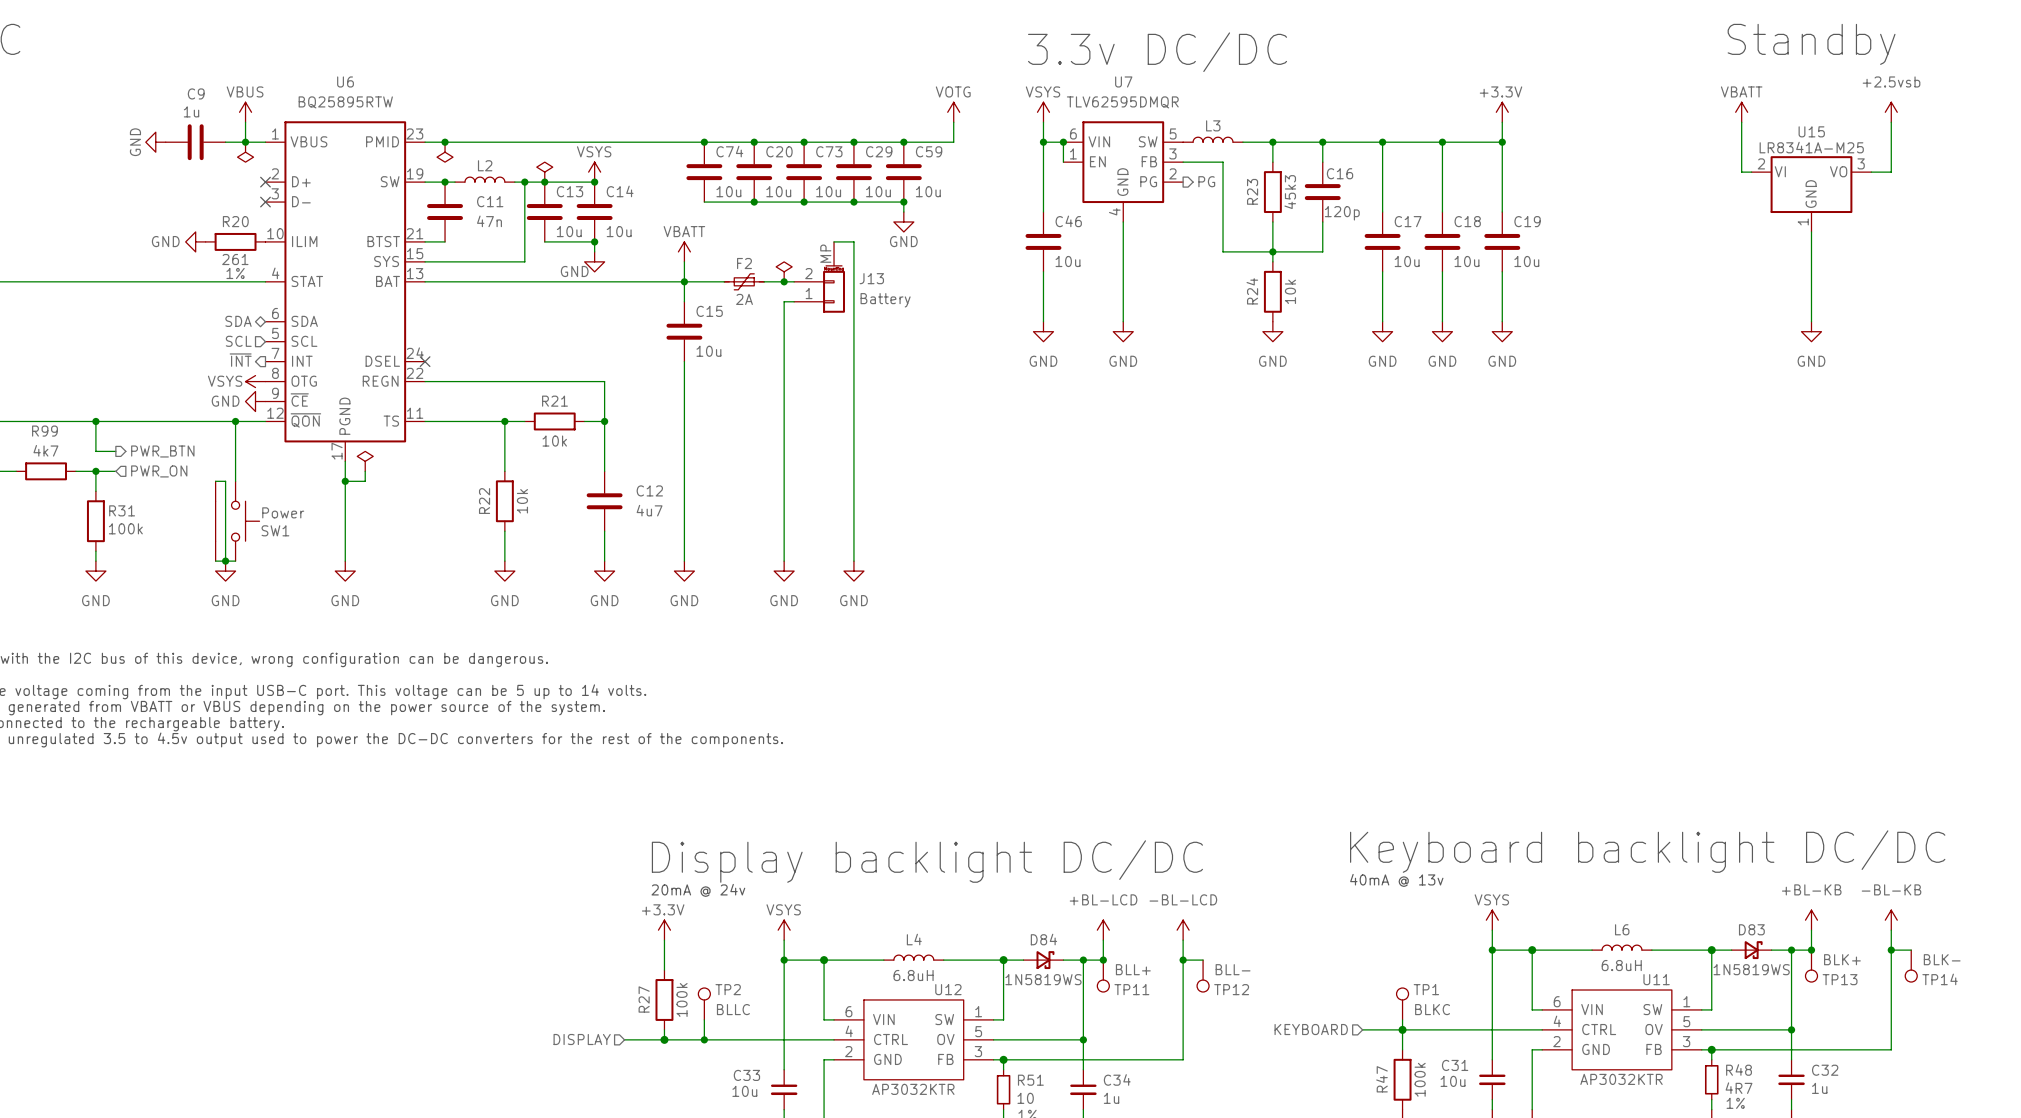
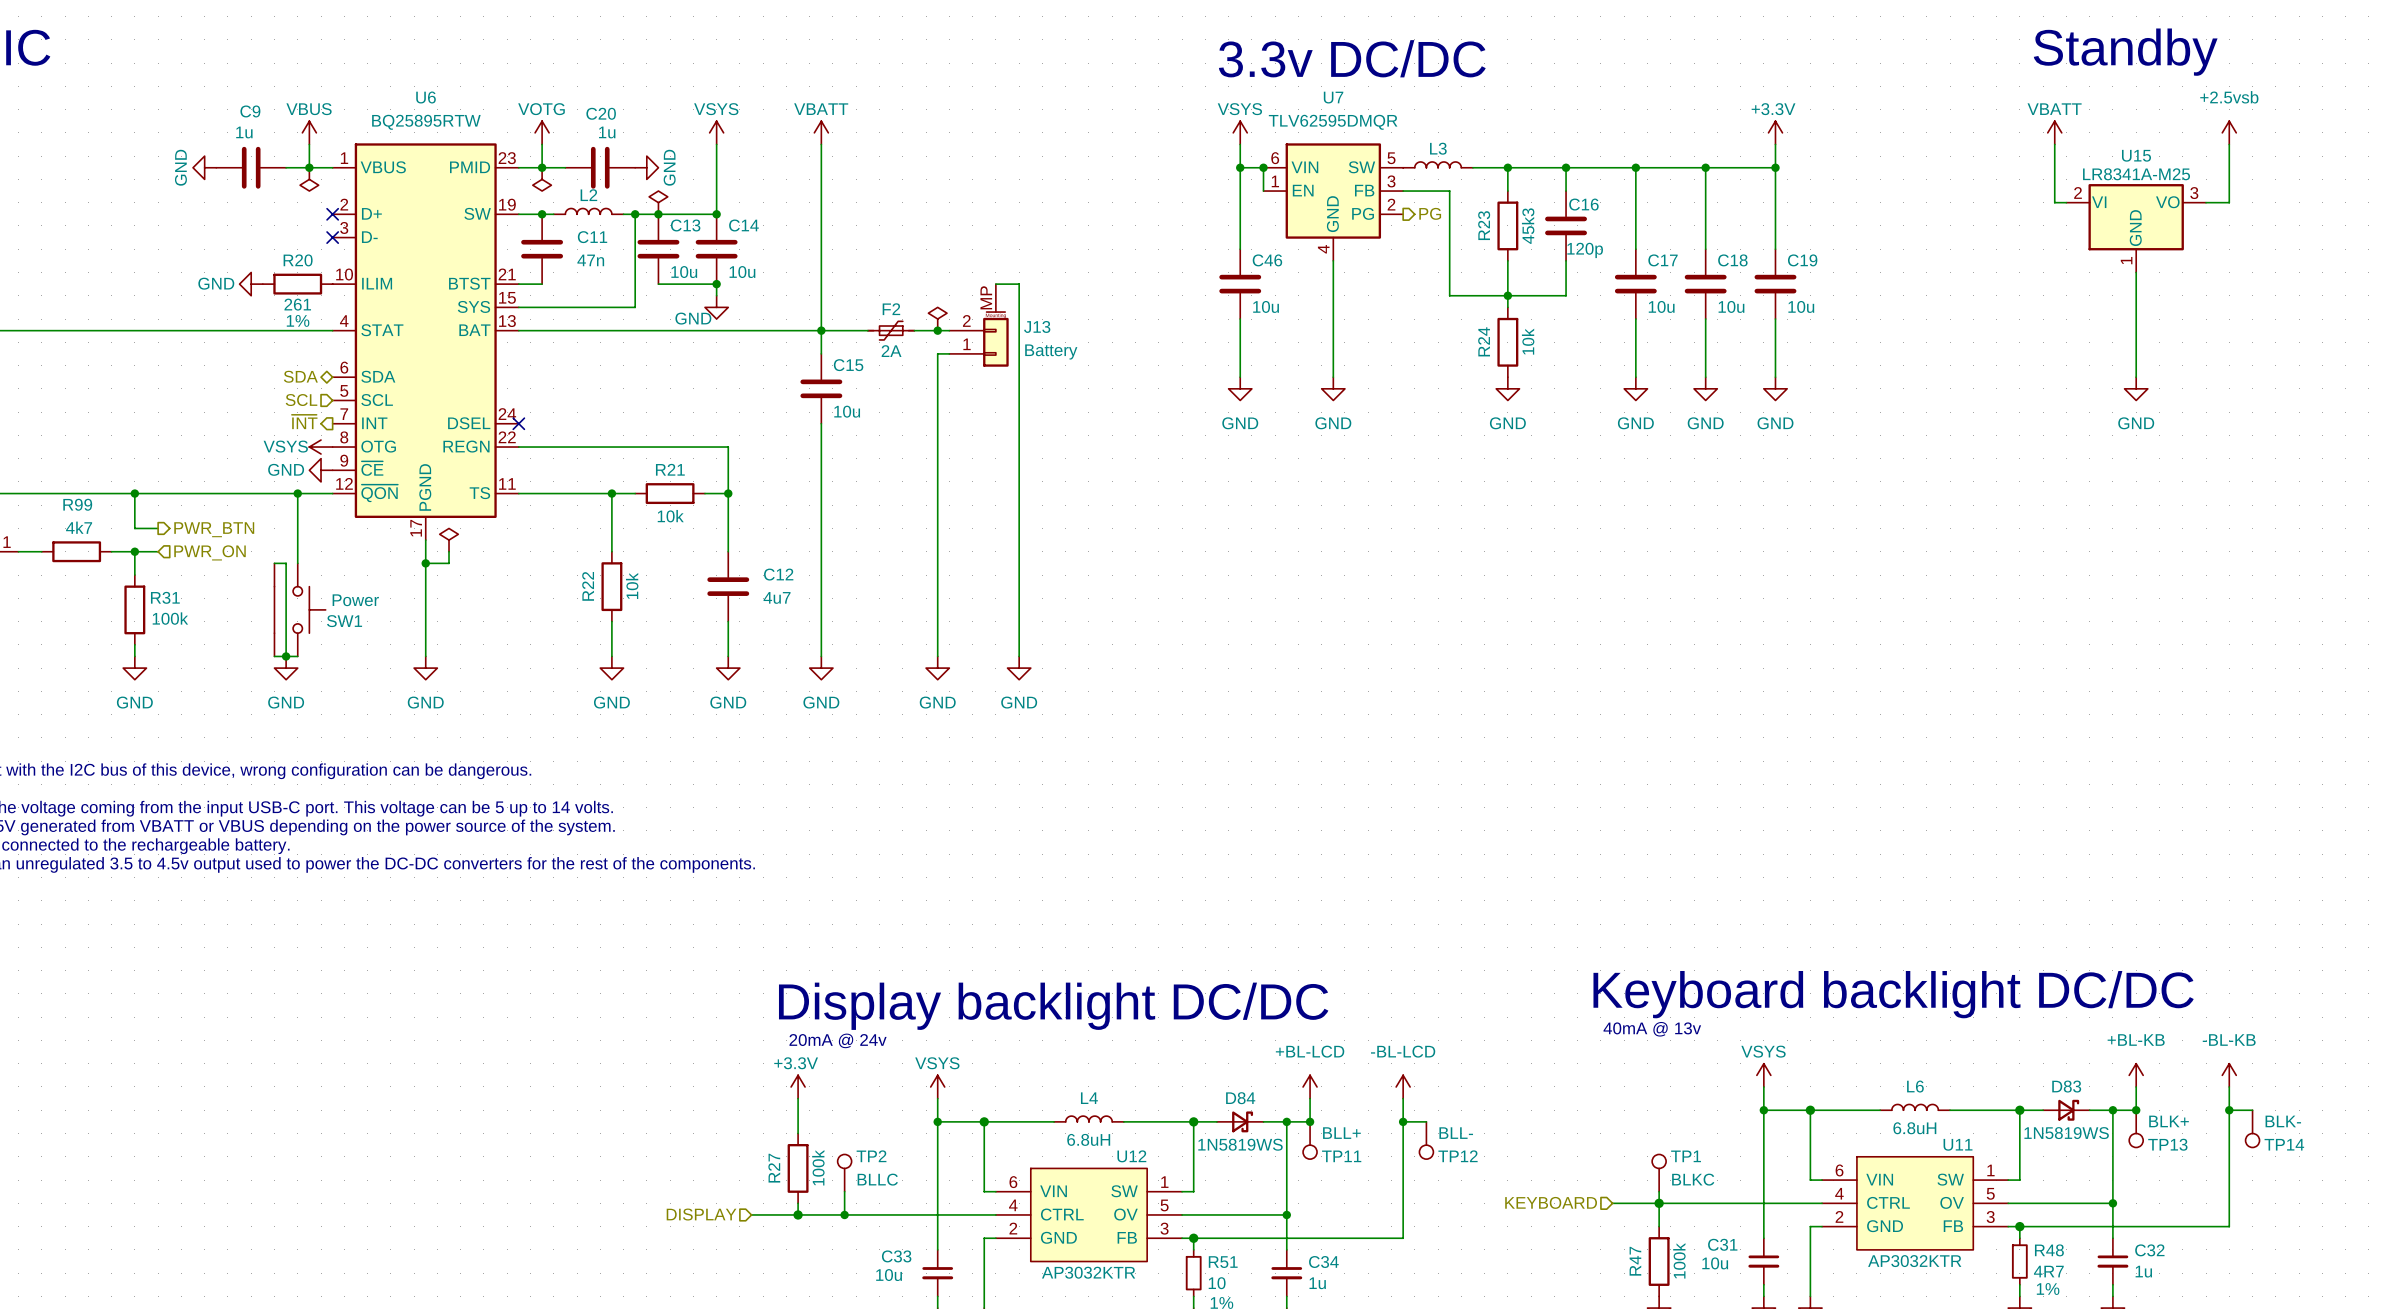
power symbol: none -> VOTG (542, 132)
power symbol: VOTG (953, 112) -> none
wire: none -> (542, 144) (542, 167)
wire: none -> (716, 144) (716, 214)
wire: none -> (821, 144) (821, 307)
wire: (953, 122) (953, 142) (464, 142) -> none
power symbol: none -> GND (646, 167)
junction: (704, 142) -> none
junction: (754, 142) -> none
junction: (804, 142) -> none
junction: (853, 142) -> none
junction: (903, 142) -> none
C20 name position: C20 (779, 151) -> C20 (601, 113)
power symbol position: VSYS (594, 172) -> VSYS (716, 132)
C74: 10u (704, 172) -> none
C20 rotation: 0° (754, 172) -> 90° clockwise (600, 167)
C20 position: (754, 172) -> (600, 167)
C73: 10u (804, 172) -> none
C29: 10u (853, 172) -> none
C59: 10u (903, 172) -> none
C20 value: 10u (778, 191) -> 1u (607, 132)
wire: (704, 202) (903, 202) (903, 212) -> none
junction: (754, 202) -> none
junction: (804, 202) -> none
junction: (853, 202) -> none
junction: (903, 202) -> none
power symbol: GND (903, 221) -> none
power symbol position: VBATT (684, 251) -> VBATT (821, 132)

